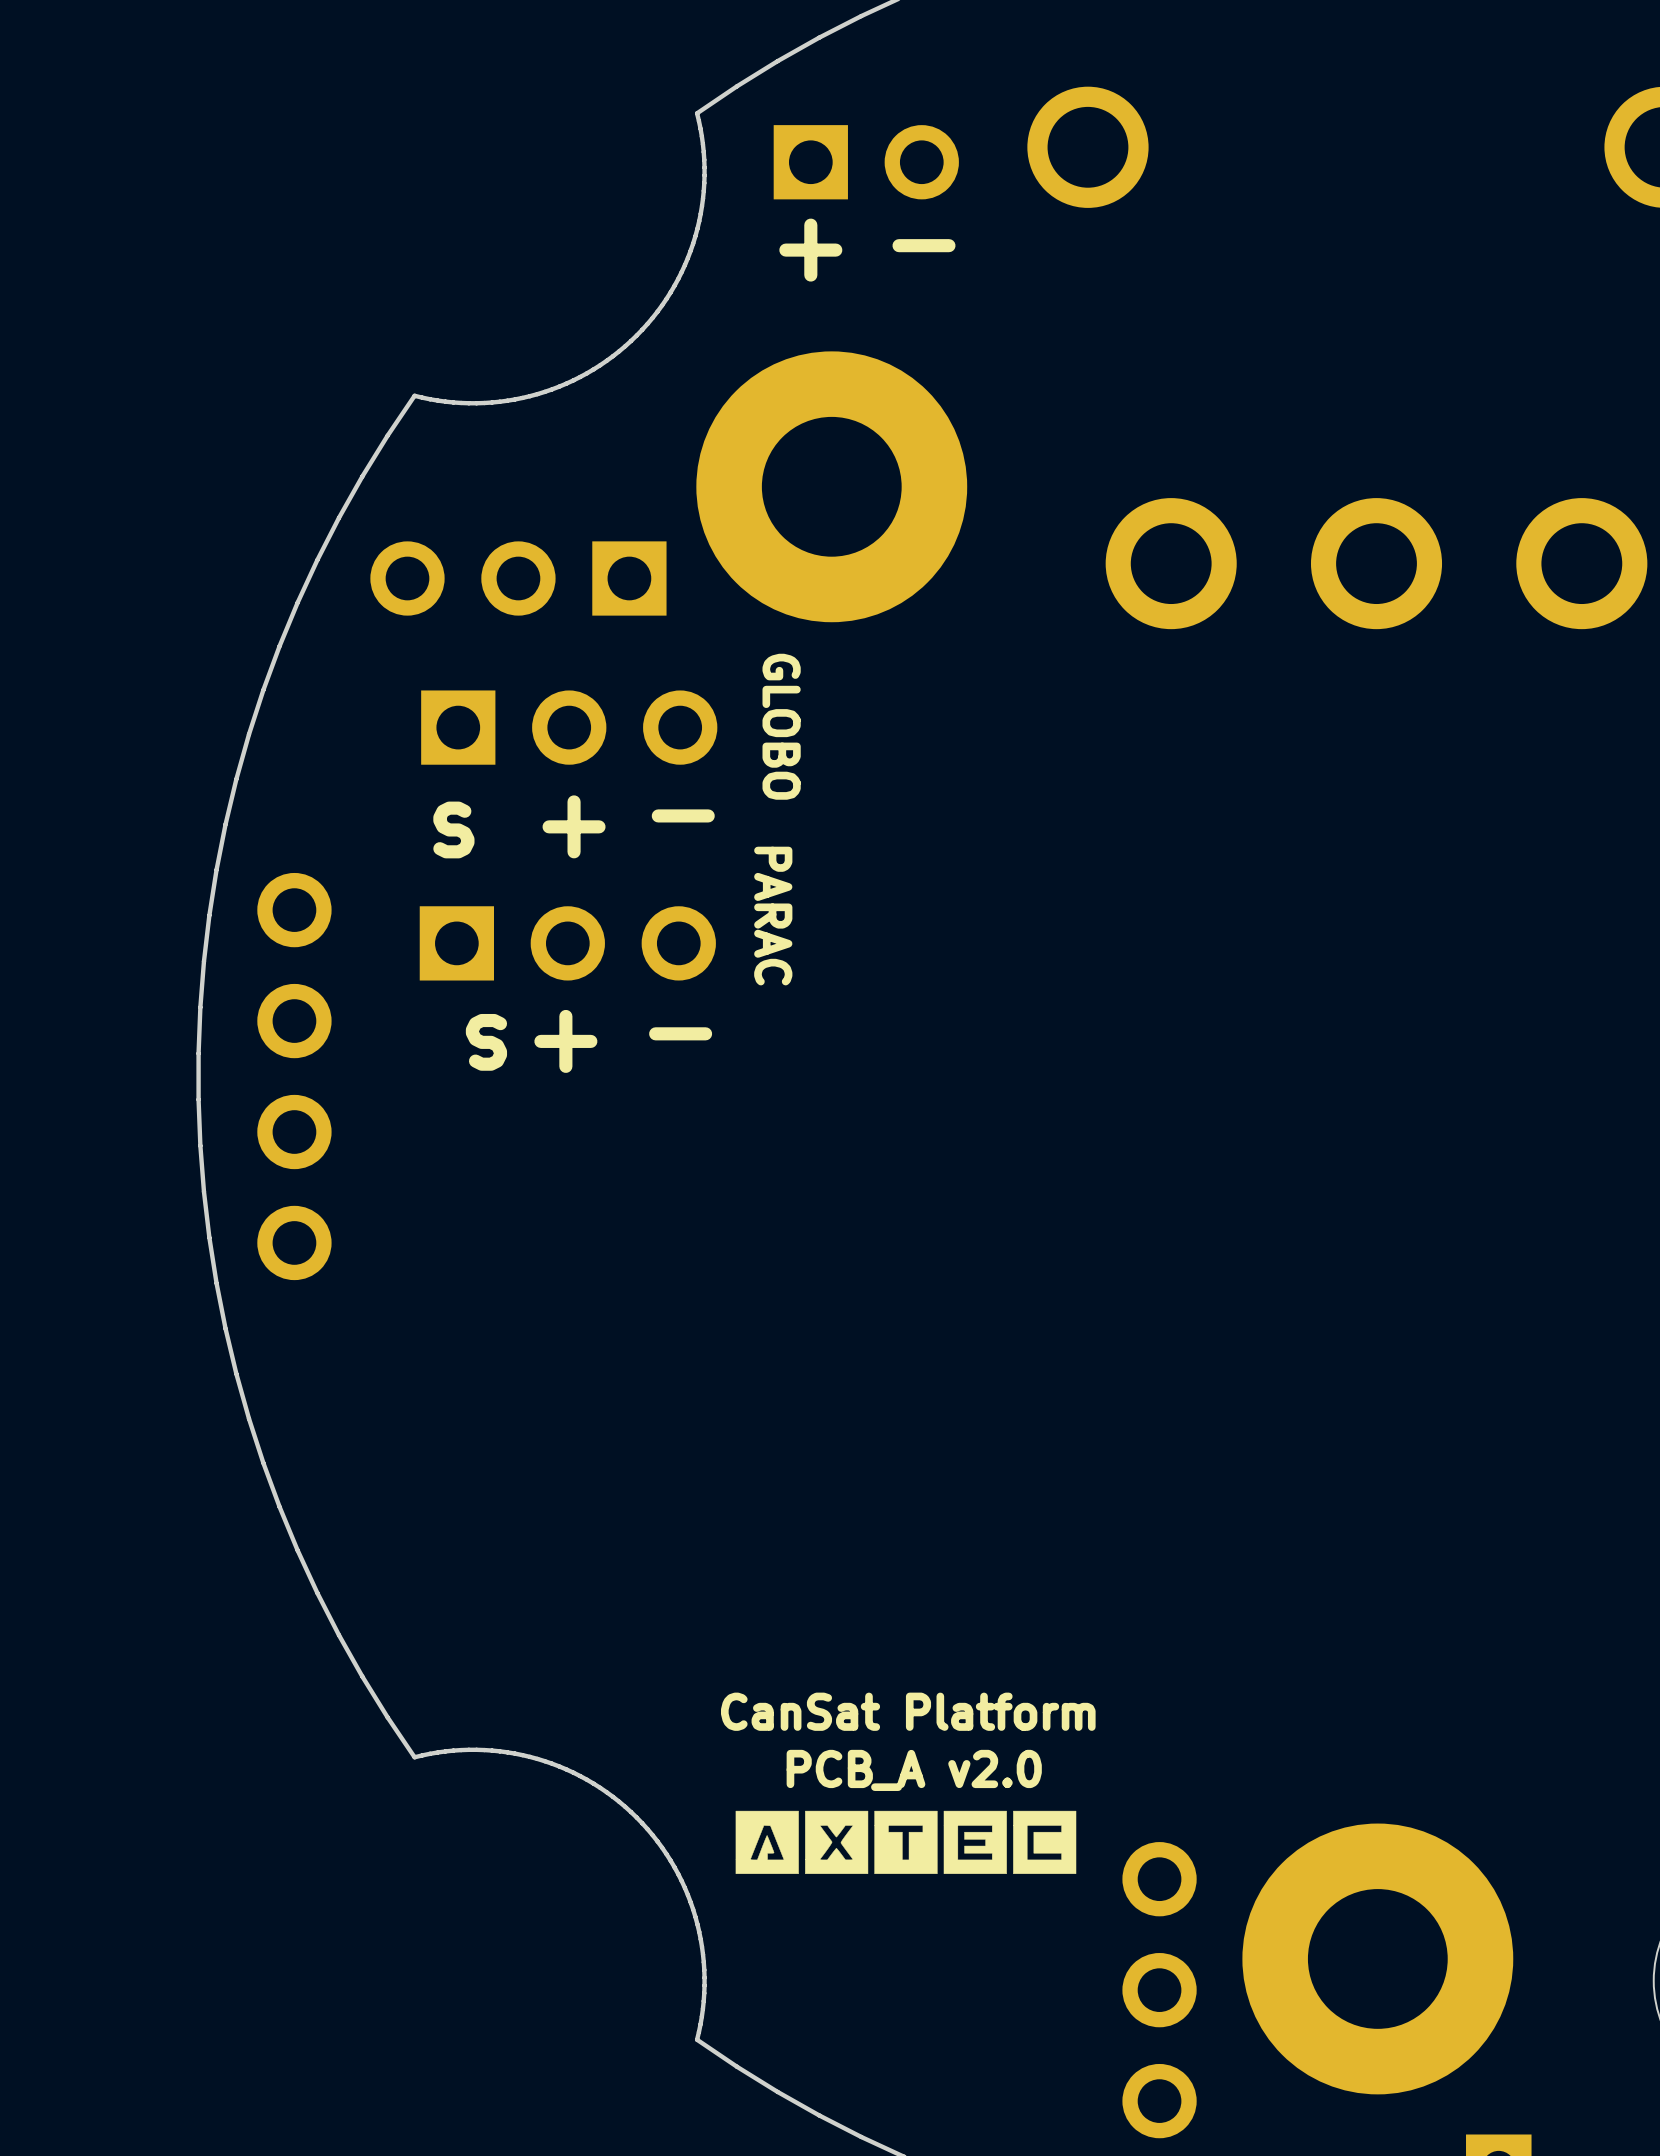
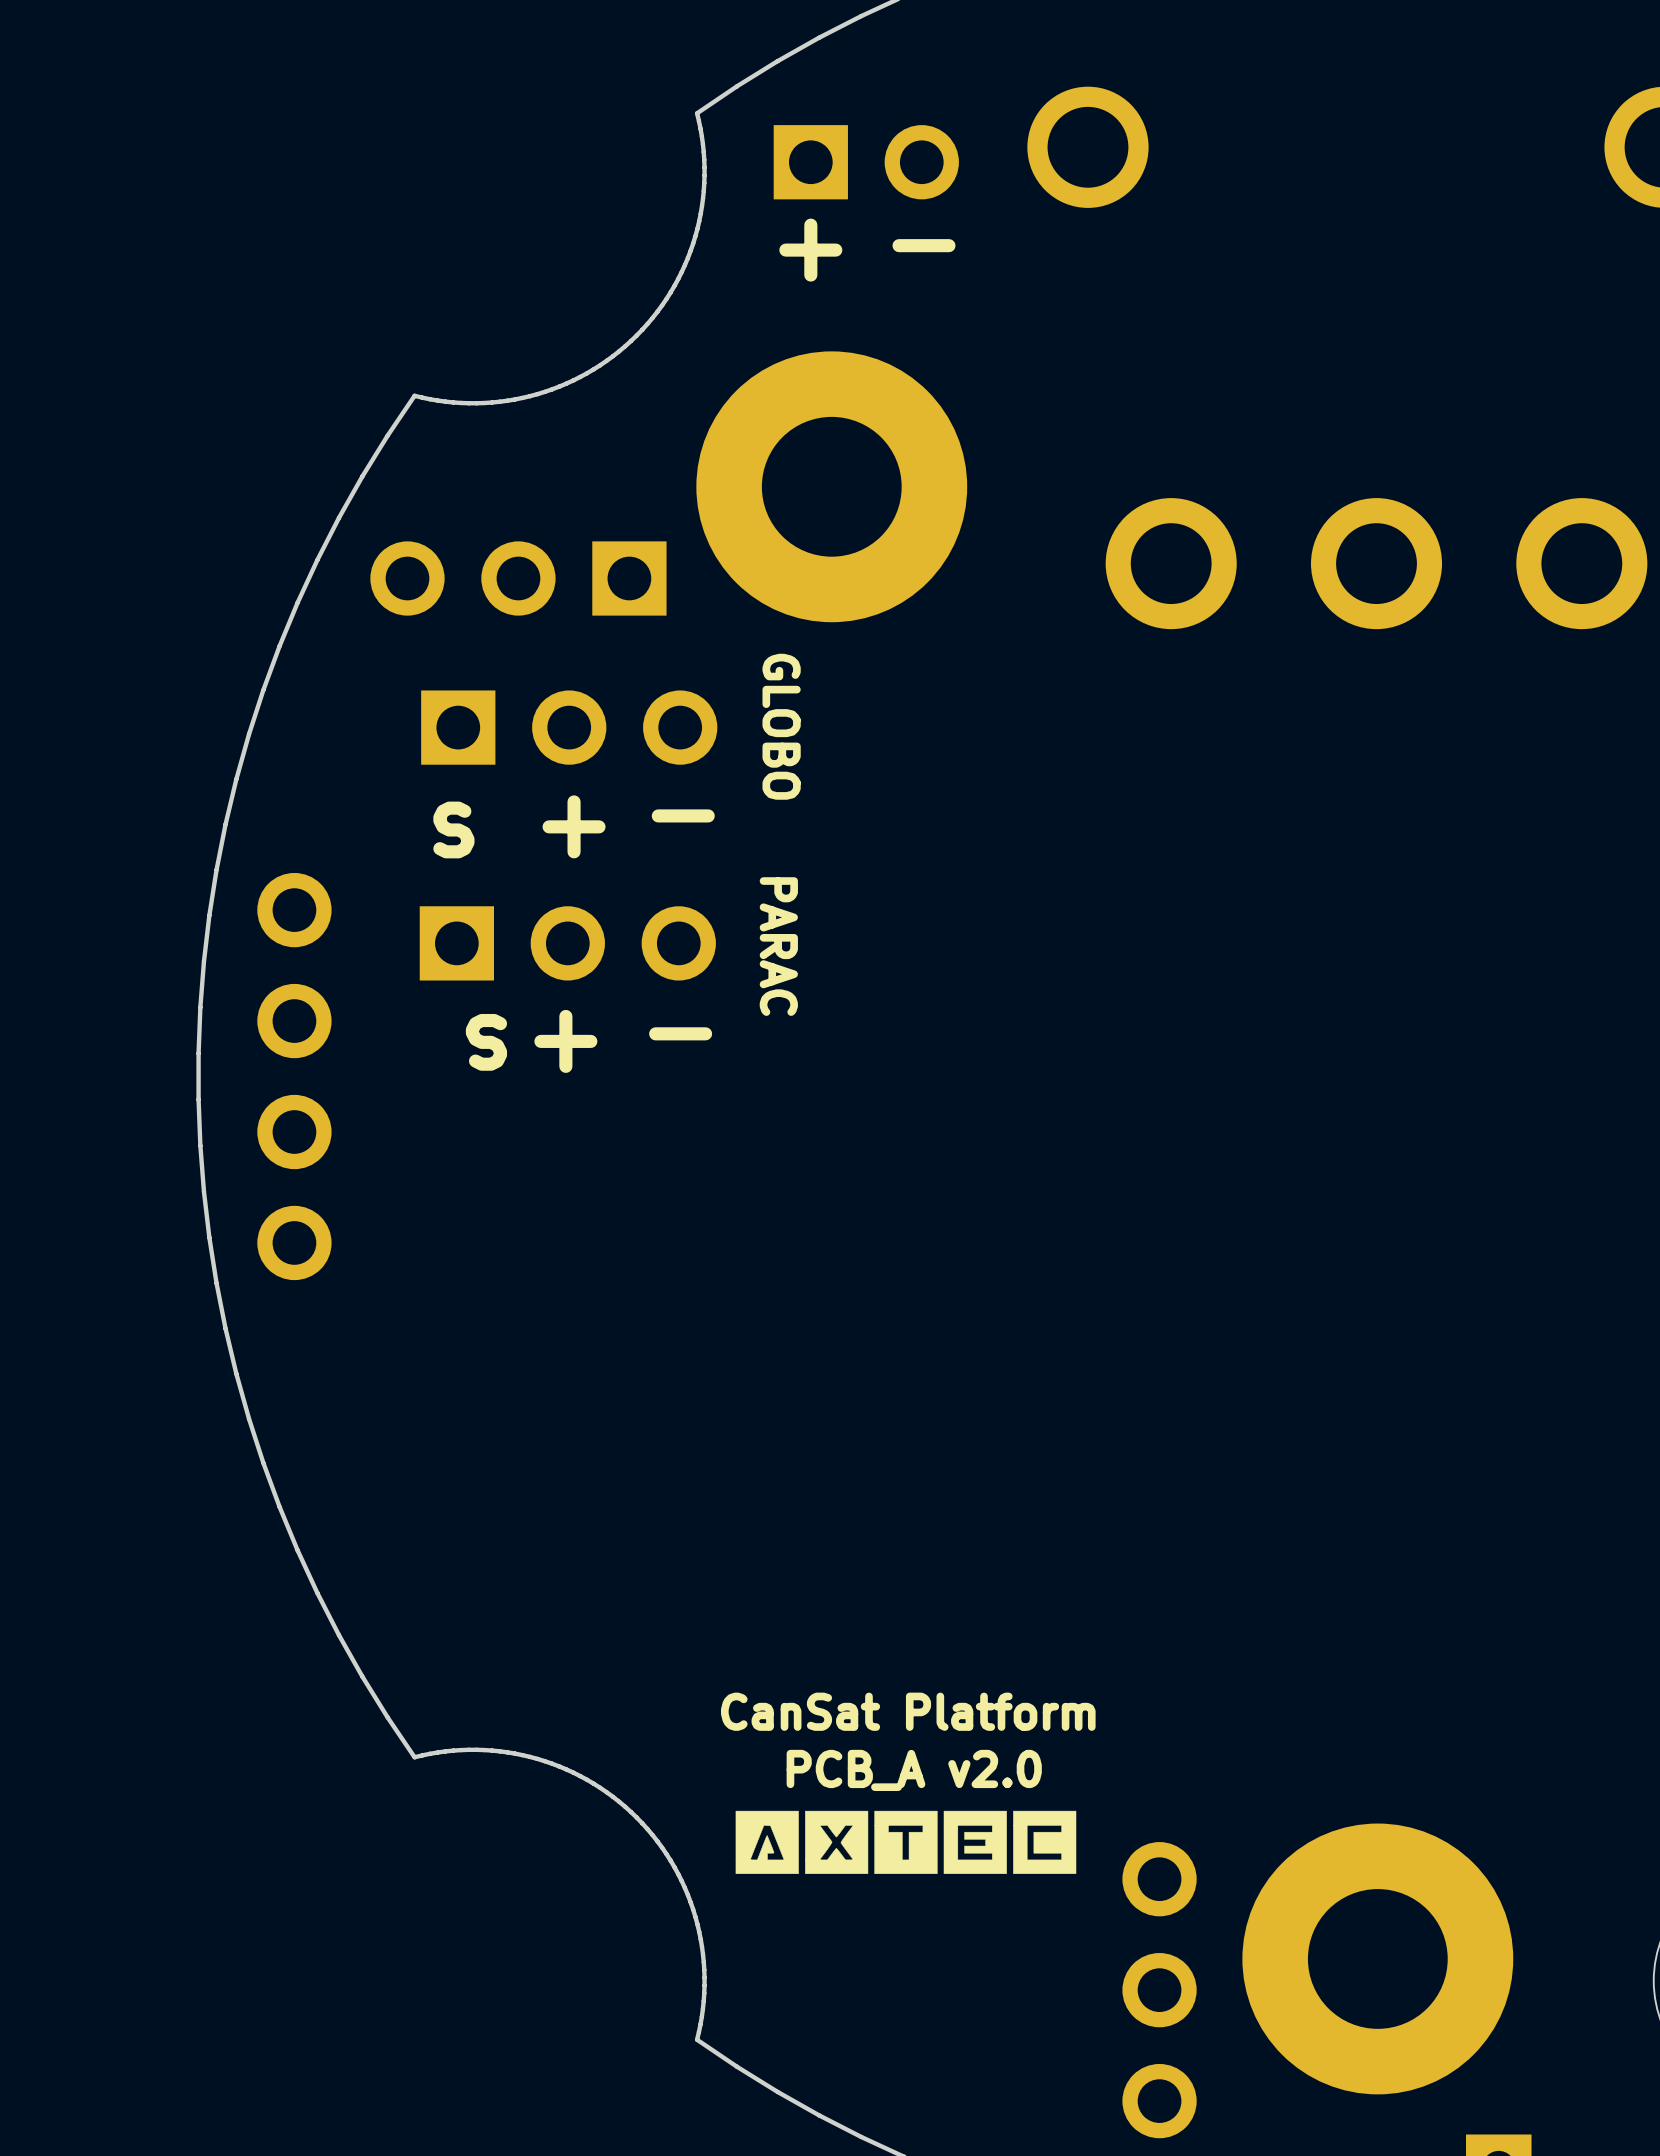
text position: PARAC (773, 916) -> PARAC (778, 946)

